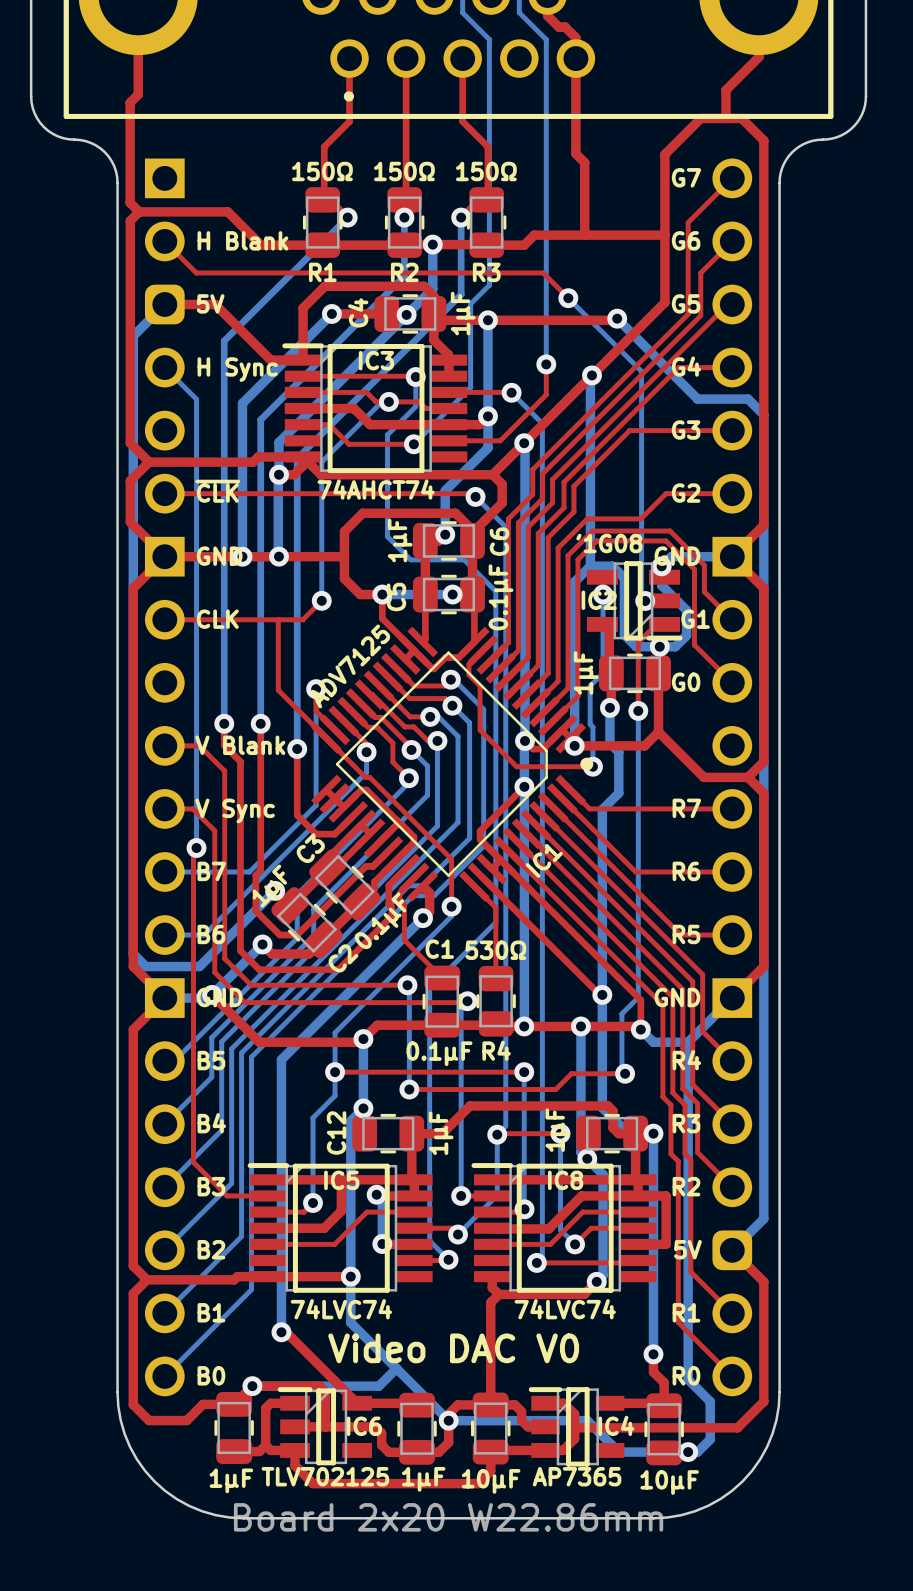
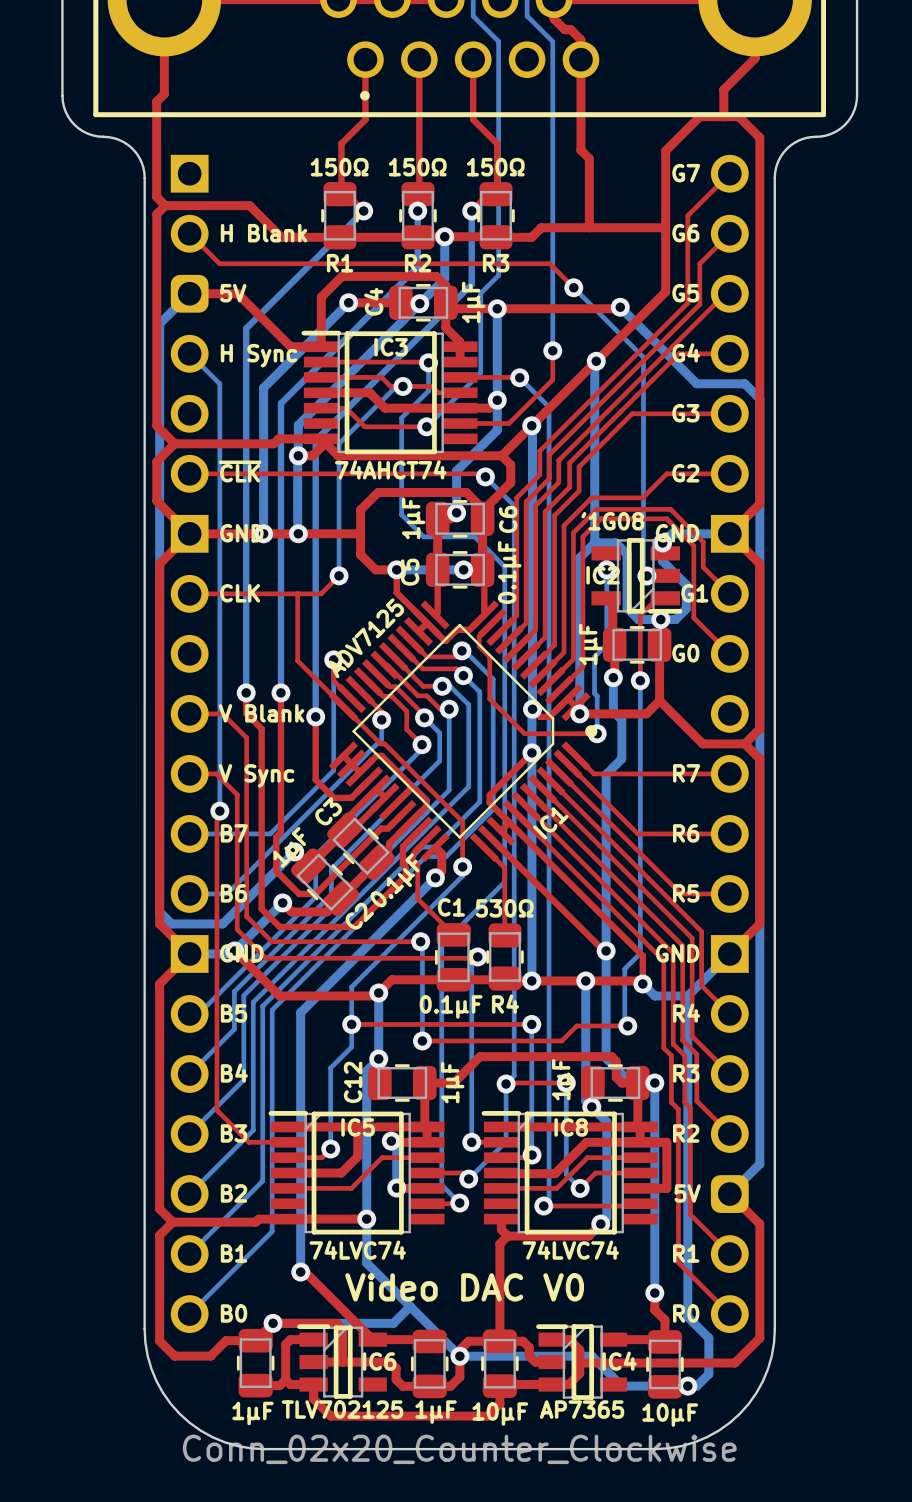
part value: Board 2x20 W22.86mm (448, 1517) -> Conn_02x20_Counter_Clockwise (459, 1449)

